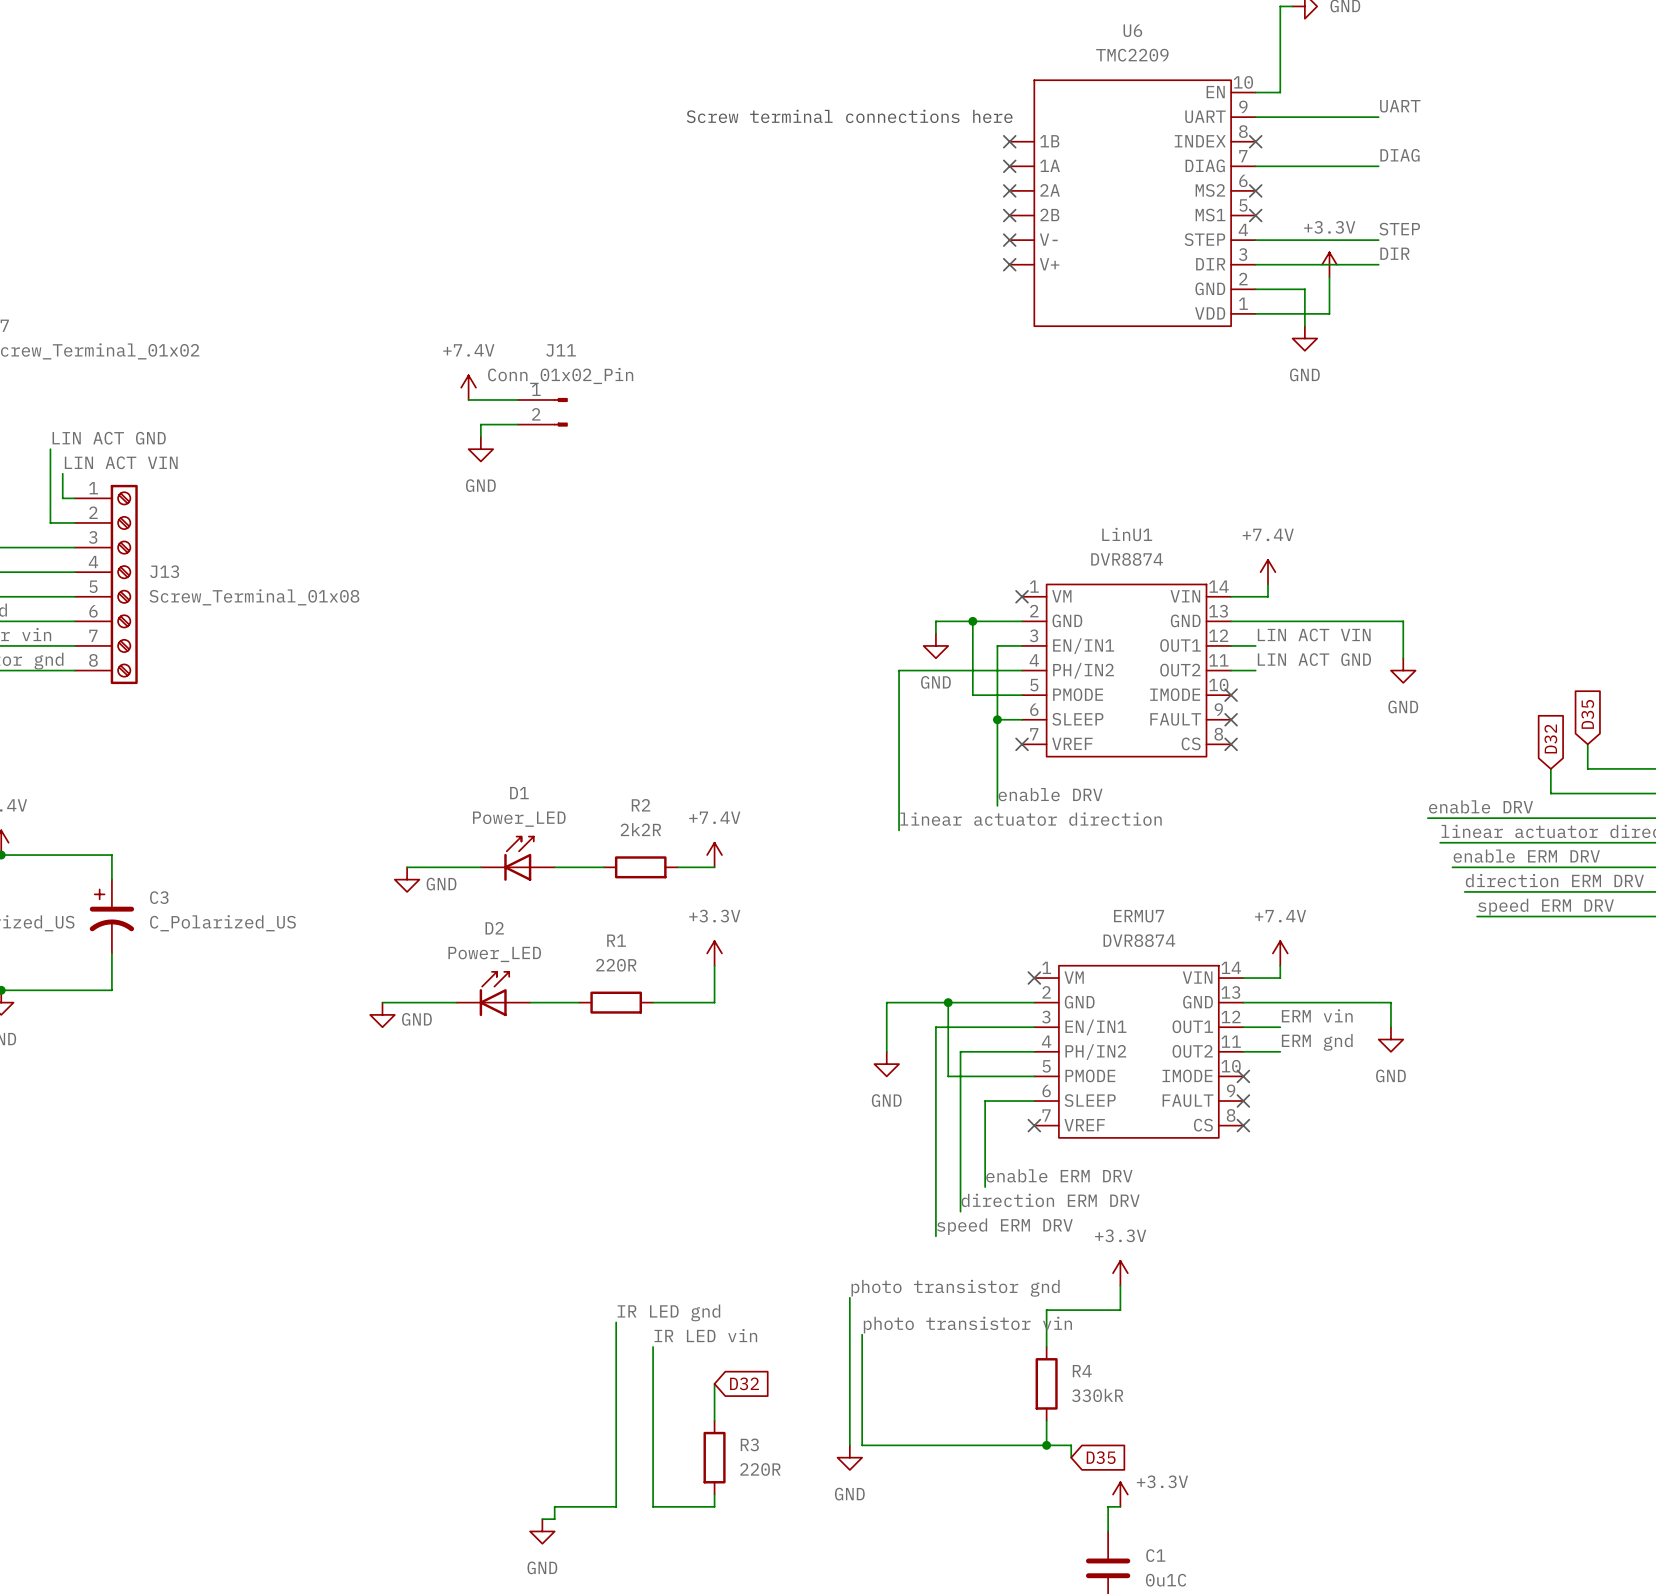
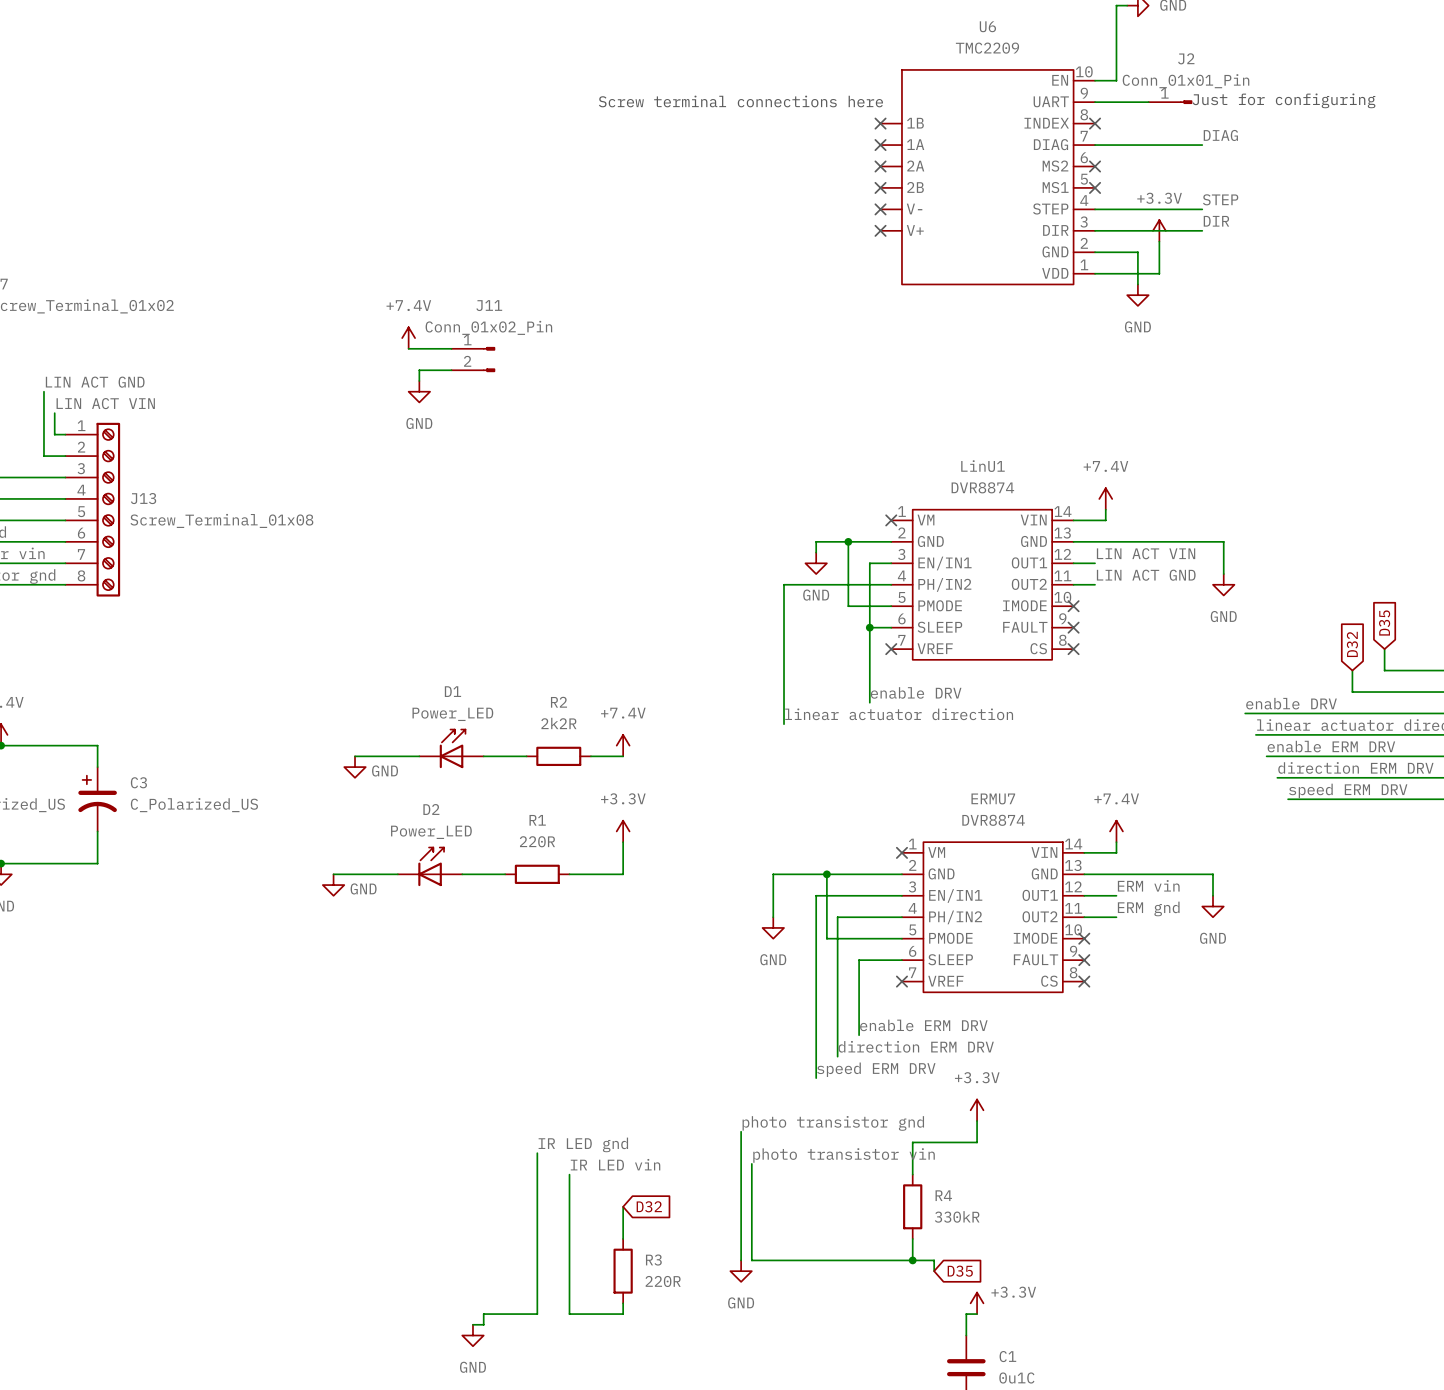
label: UART (1400, 106) -> none
text: none -> Just for configuring (1284, 100)
J2: none -> Conn_01x01_Pin (1170, 102)

